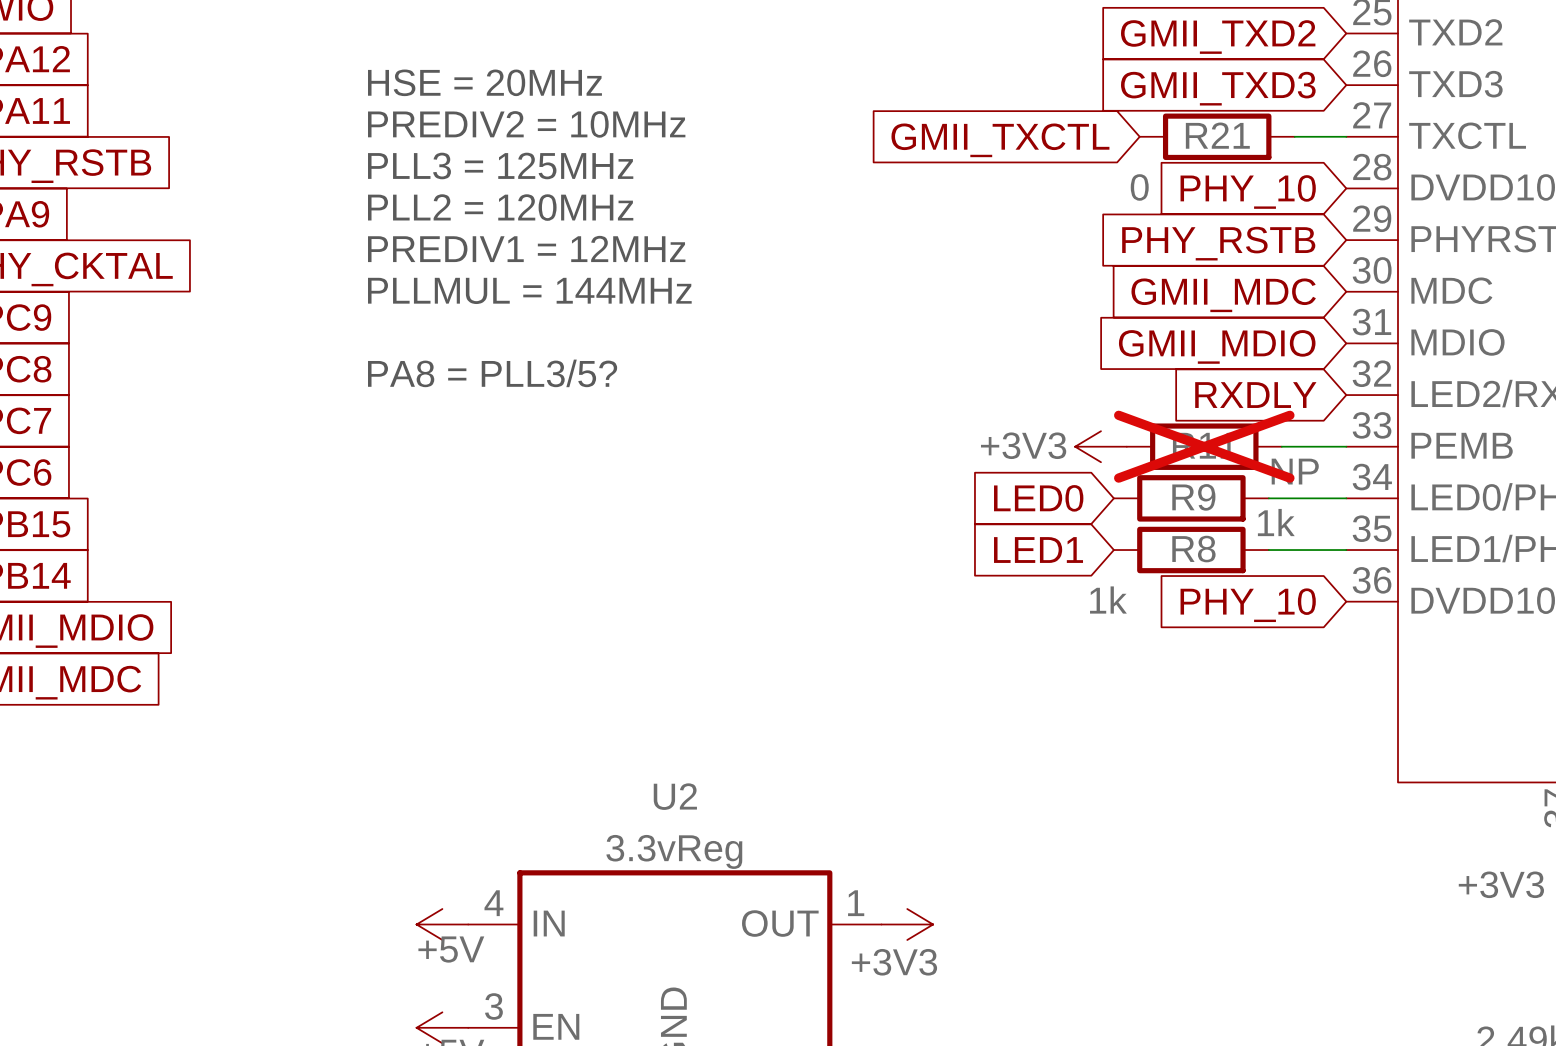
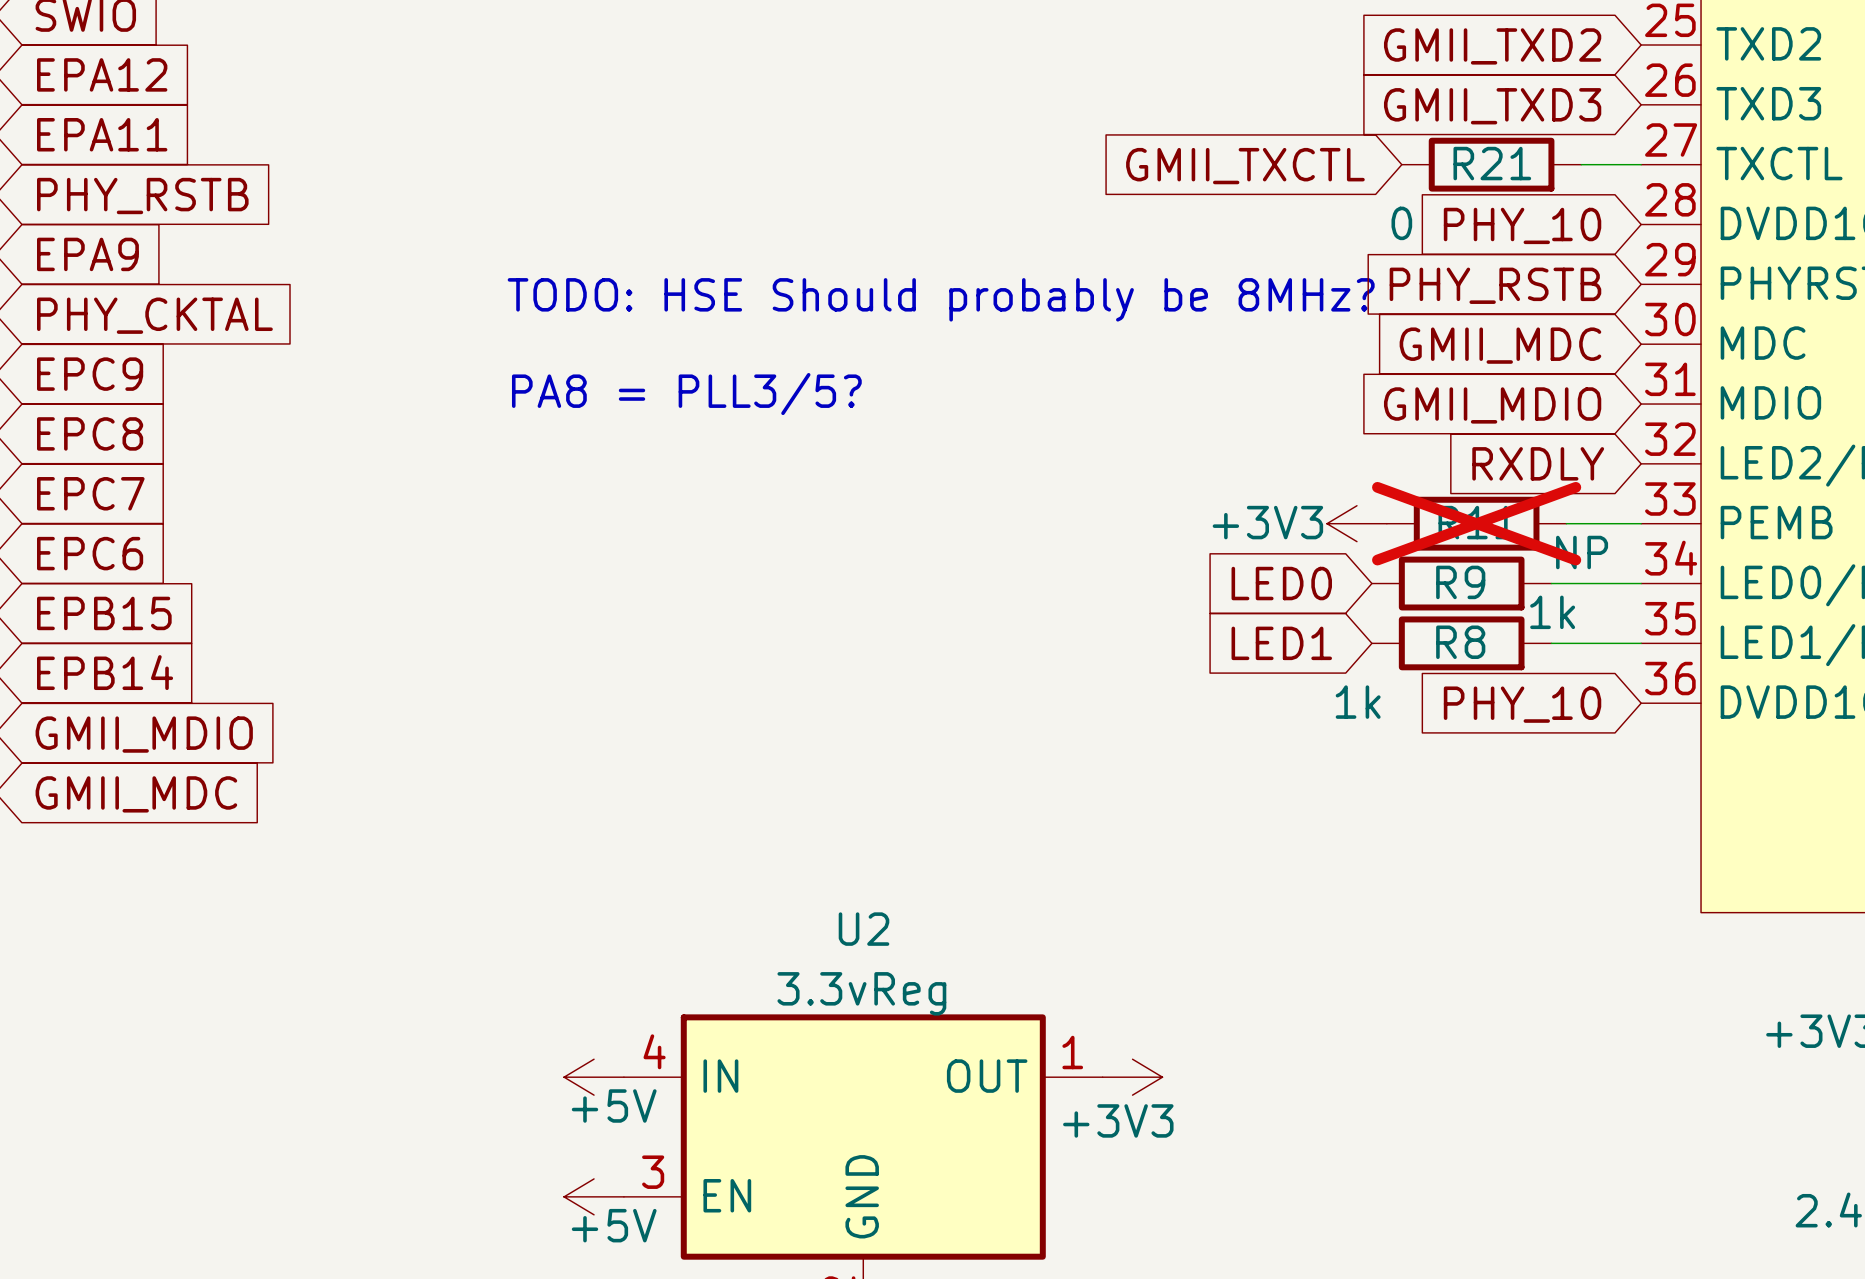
text: HSE = 20MHz (484, 82) -> none
text: PREDIV2 = 10MHz (526, 124) -> none
text: PLL3 = 125MHz (500, 165) -> none
text: PLL2 = 120MHz (500, 207) -> none
text: PREDIV1 = 12MHz (526, 248) -> TODO: HSE Should probably be 8MHz? (941, 299)
text: PLLMUL = 144MHz (529, 290) -> none
text position: PA8 = PLL3/5? (492, 373) -> PA8 = PLL3/5? (686, 394)

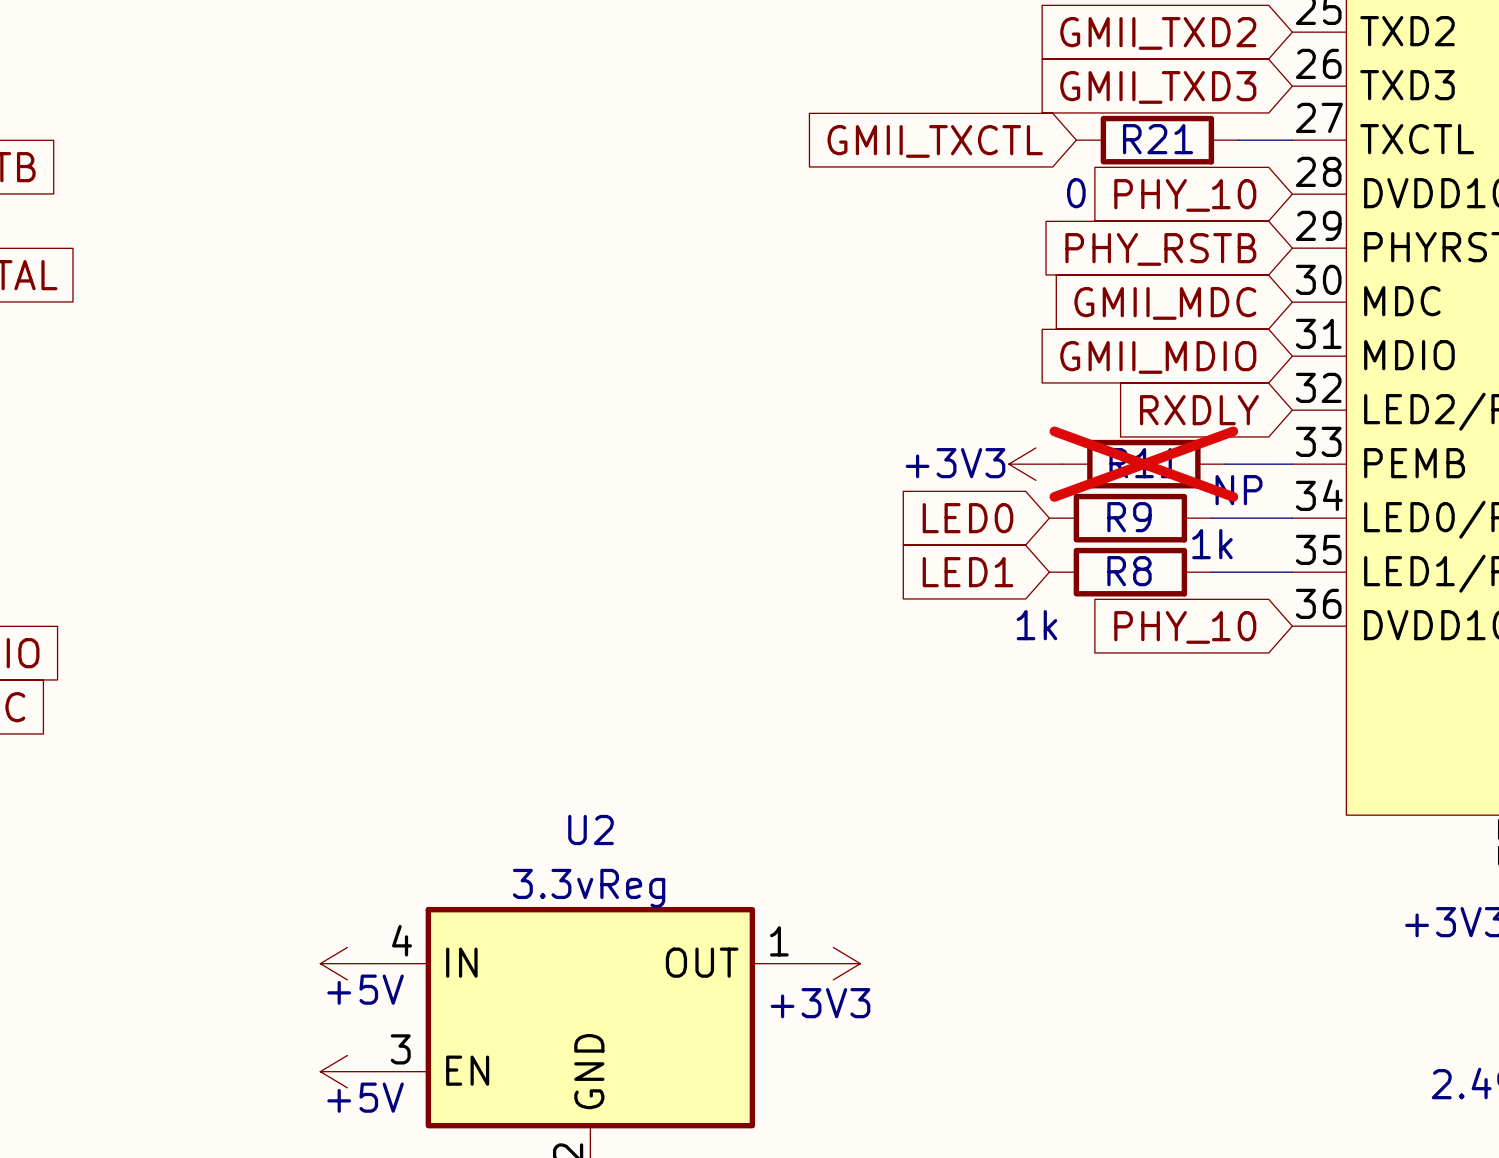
text: TODO: HSE Should probably be 8MHz? (941, 299) -> none
text: PA8 = PLL3/5? (686, 394) -> none

